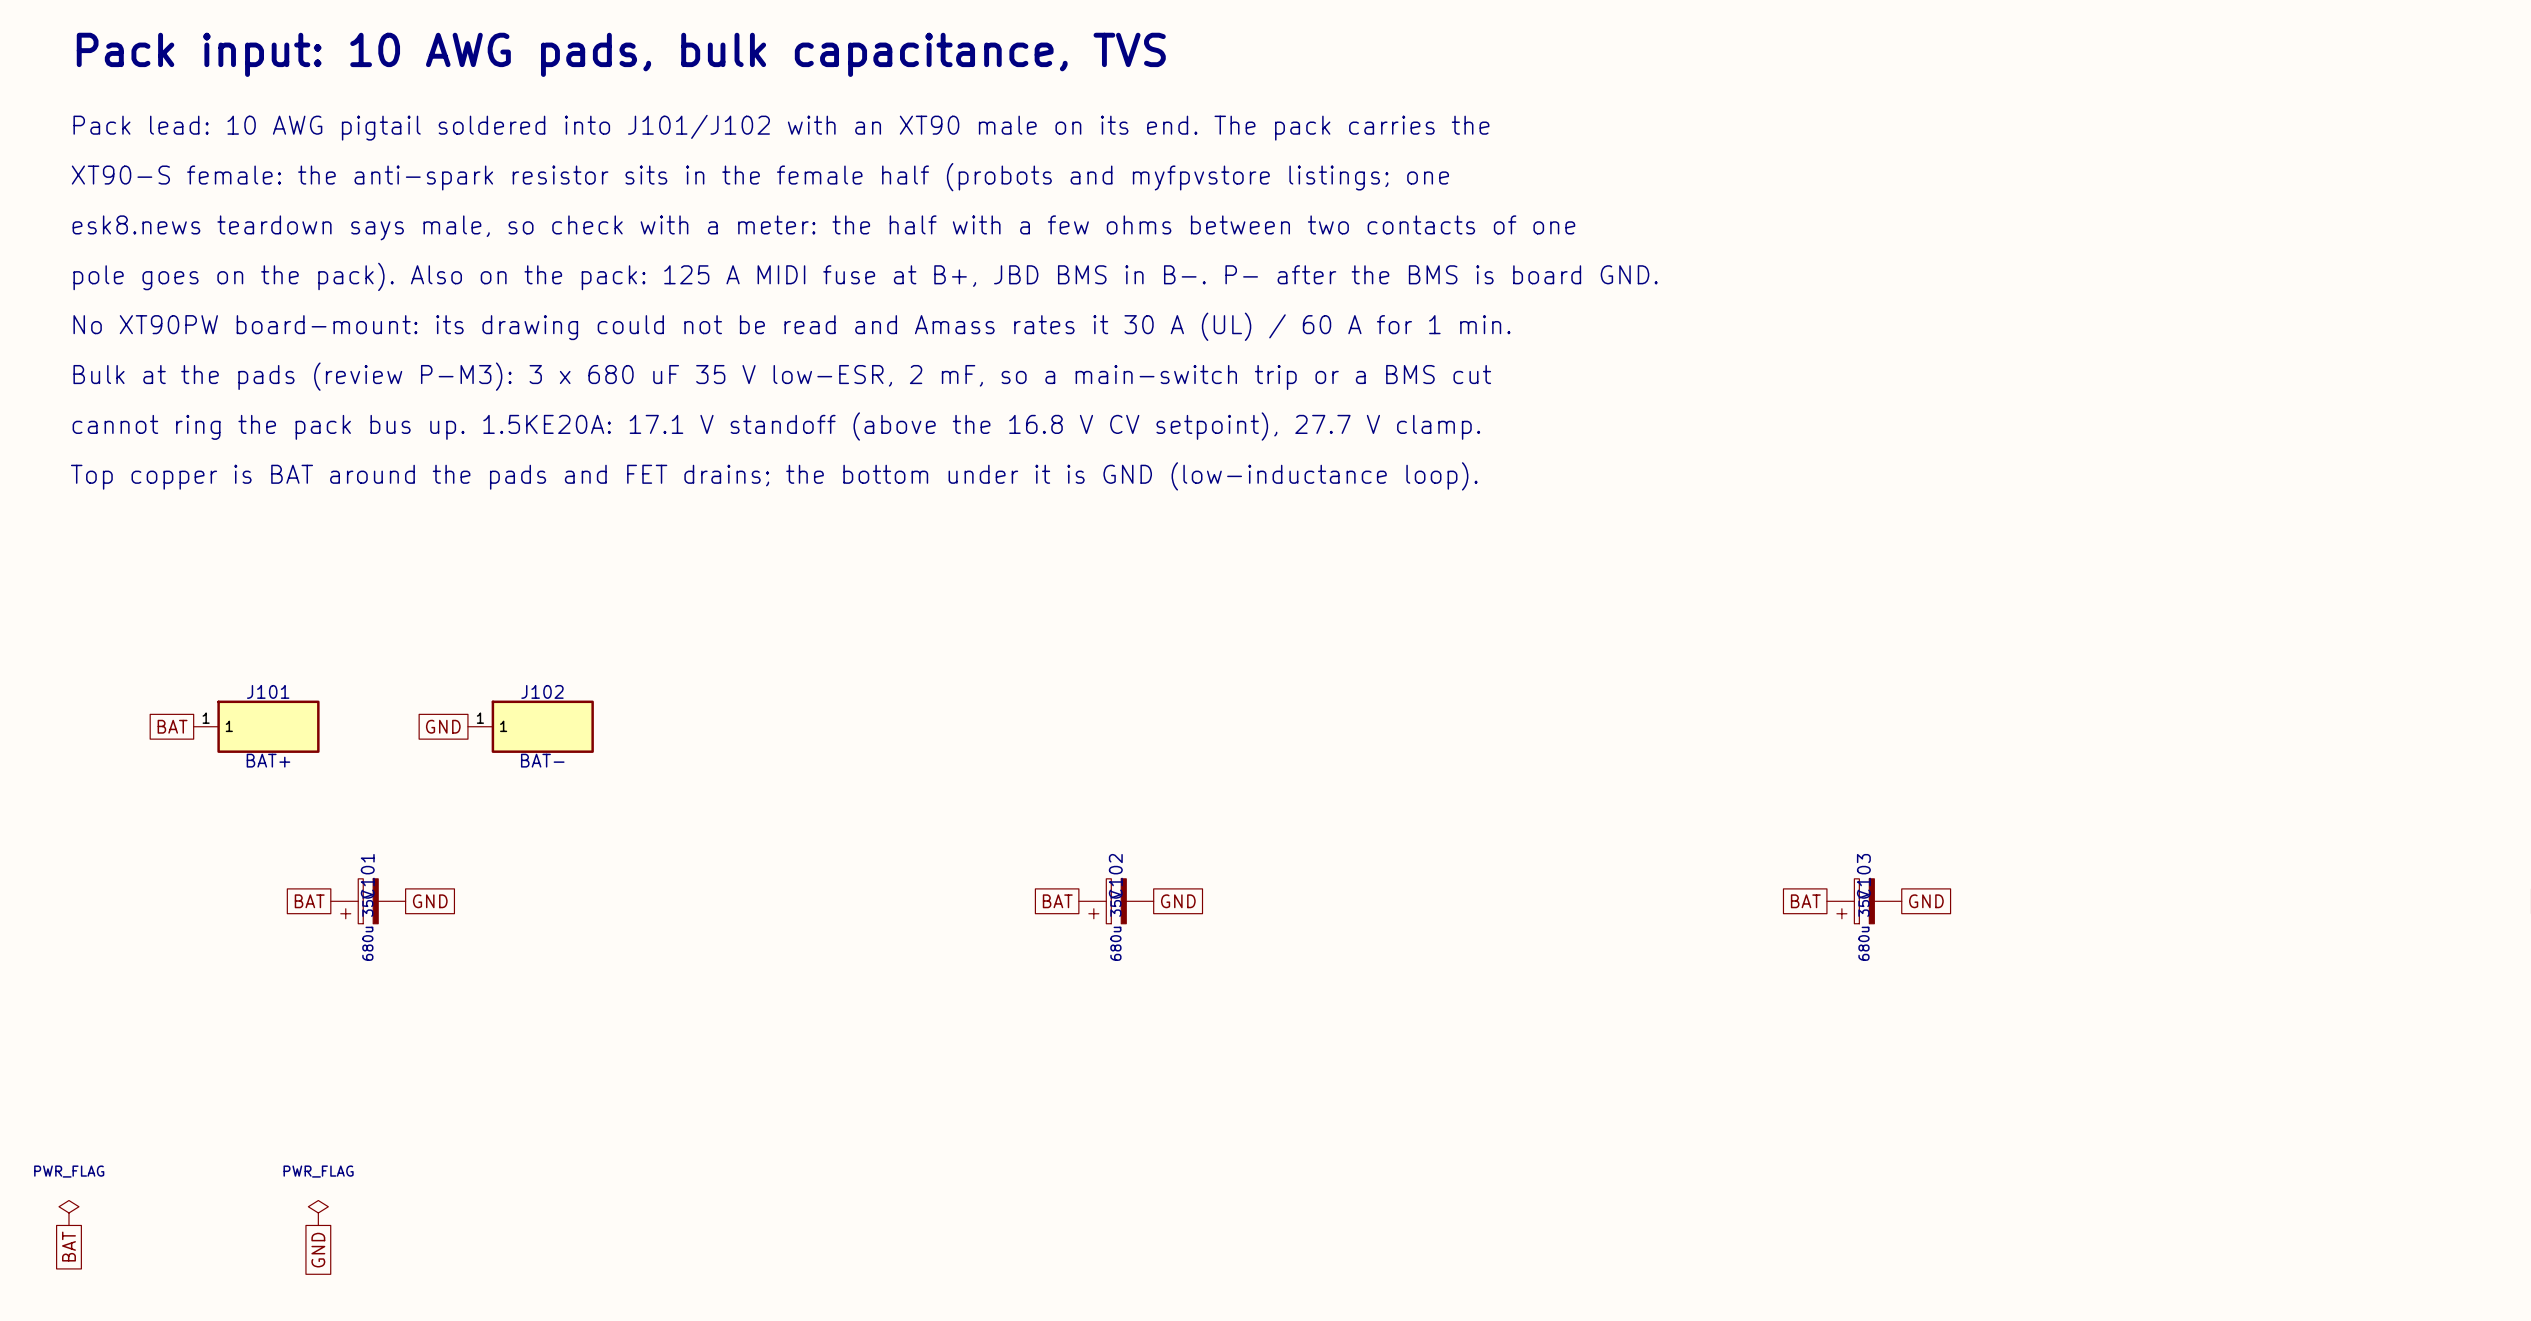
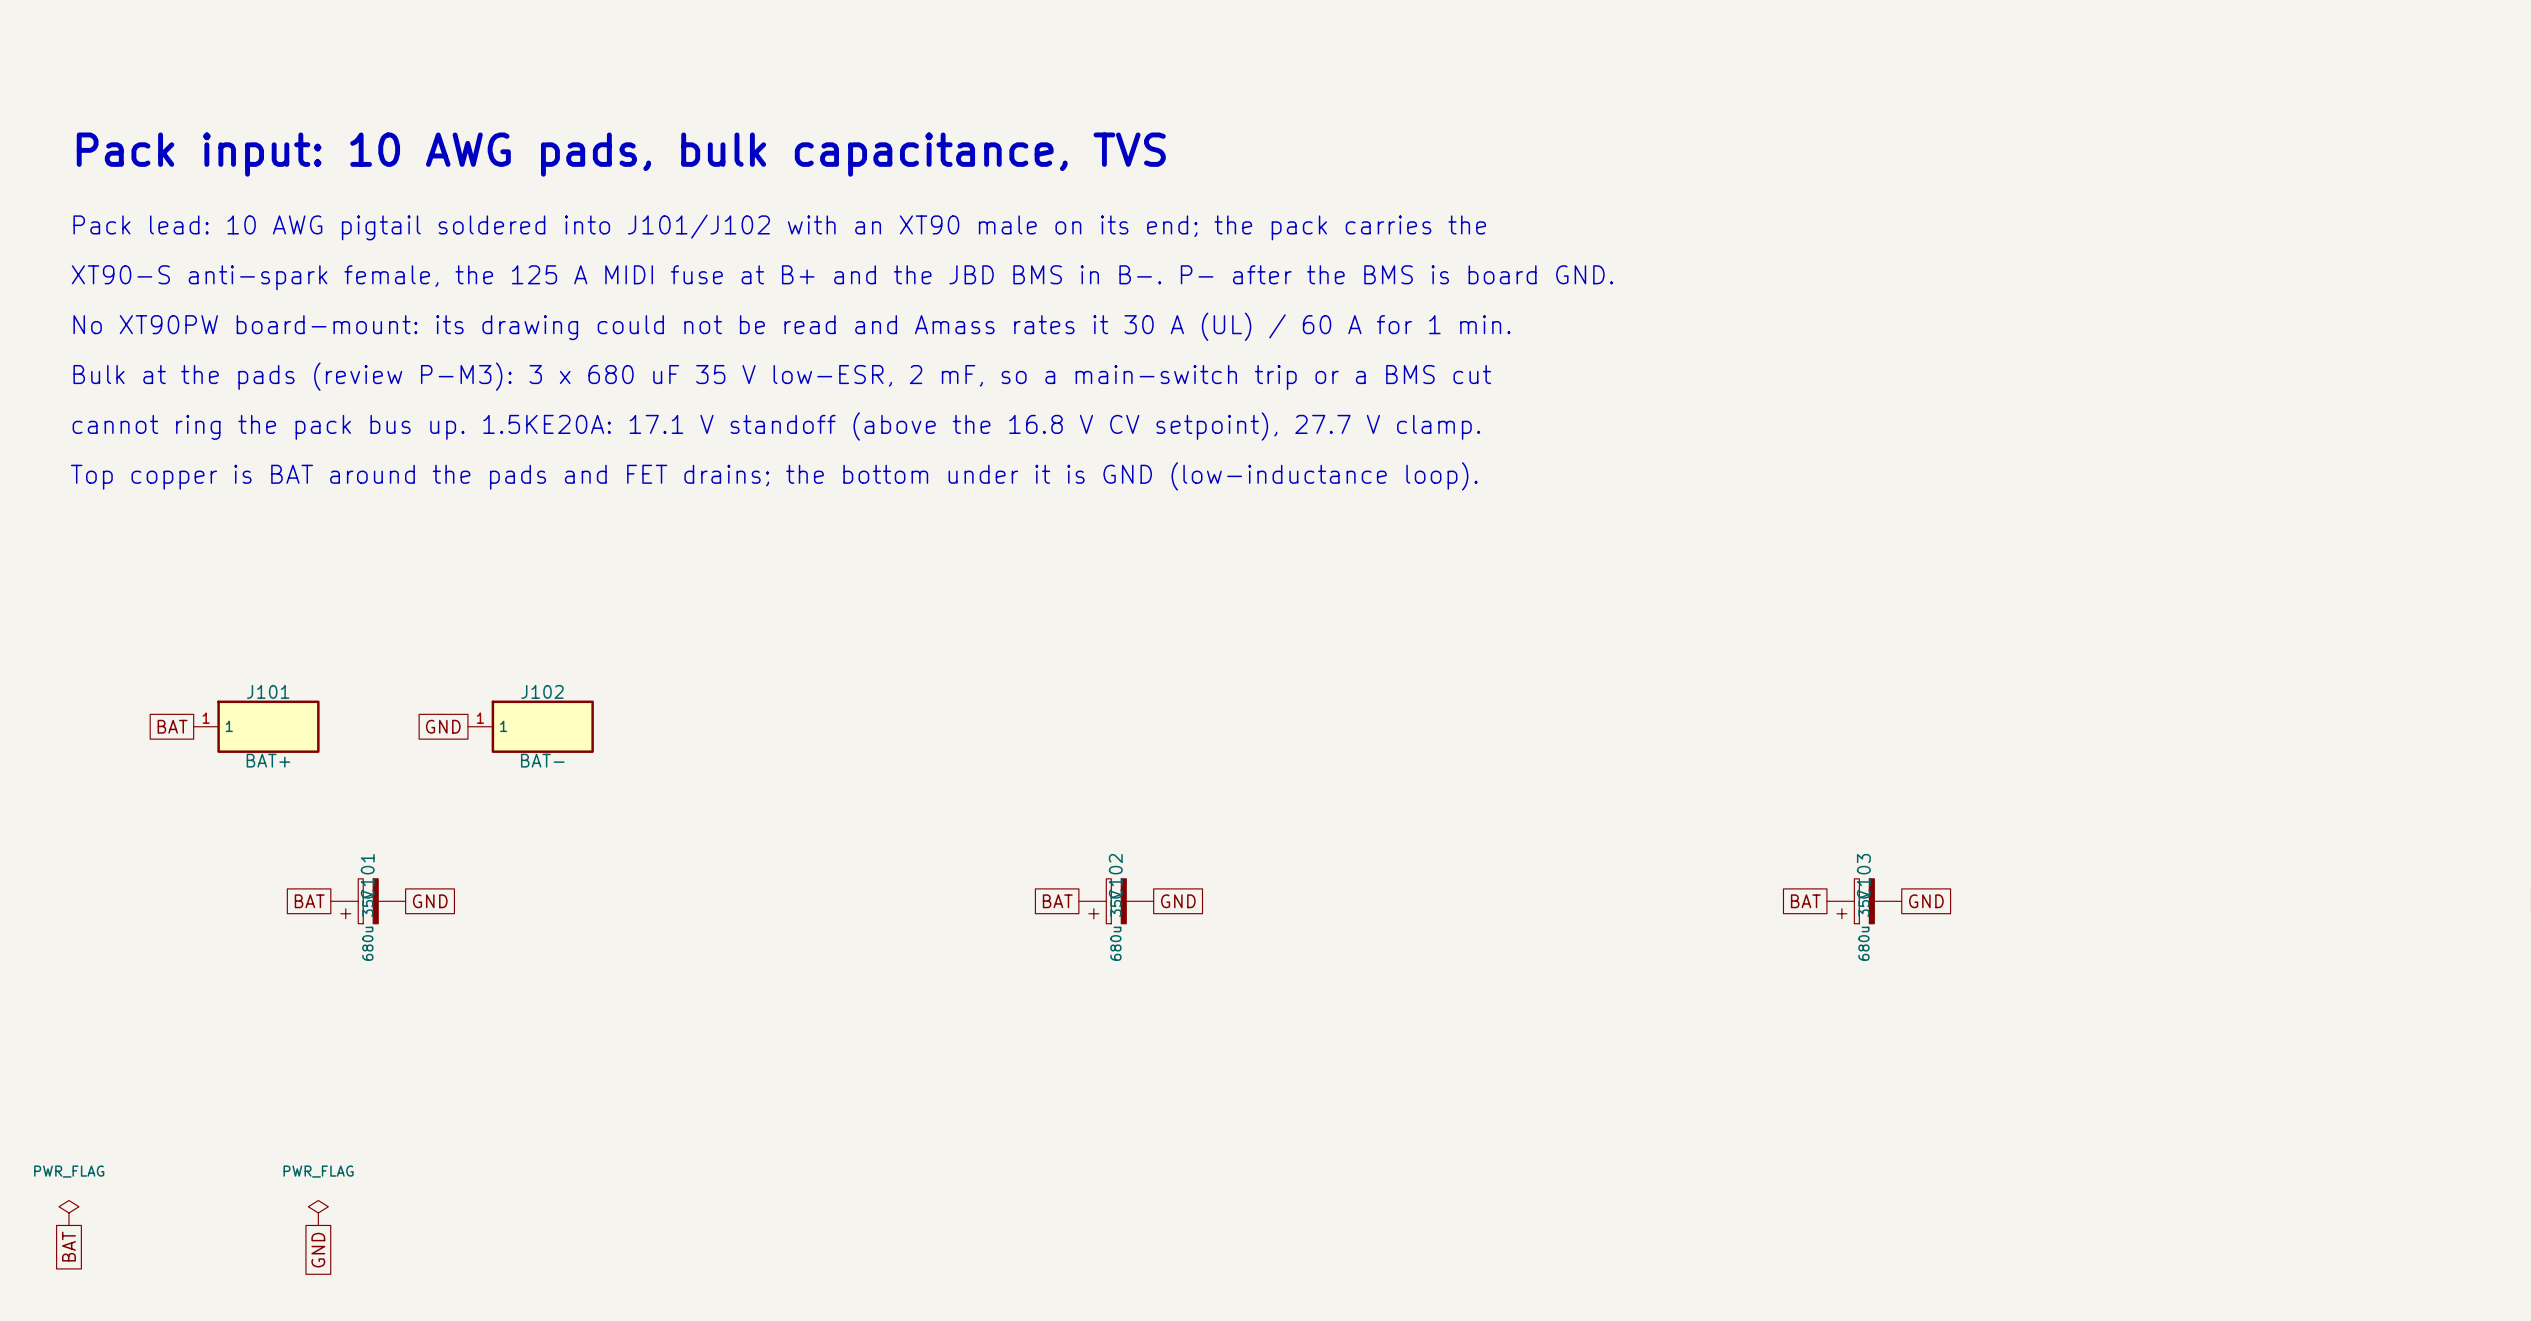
text position: Pack input: 10 AWG pads, bulk capacitance, TVS (621, 54) -> Pack input: 10 AWG pads, bulk capacitance, TVS (621, 154)
text: Pack lead: 10 AWG pigtail soldered into J101/J102 with an XT90 male on its end. The pack carries the (781, 127) -> none
text: XT90-S female: the anti-spark resistor sits in the female half (probots and myfpvstore listings; one (760, 177) -> none
text: esk8.news teardown says male, so check with a meter: the half with a few ohms between two contacts of one (823, 227) -> Pack lead: 10 AWG pigtail soldered into J101/J102 with an XT90 male on its end; the pack carries the (779, 227)
text: pole goes on the pack). Also on the pack: 125 A MIDI fuse at B+, JBD BMS in B-. P- after the BMS is board GND. (865, 276) -> XT90-S anti-spark female, the 125 A MIDI fuse at B+ and the JBD BMS in B-. P- after the BMS is board GND. (842, 277)

